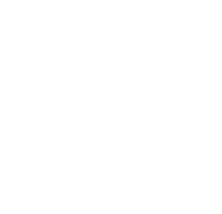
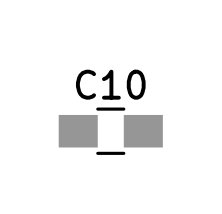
C10: none -> (110, 131)

